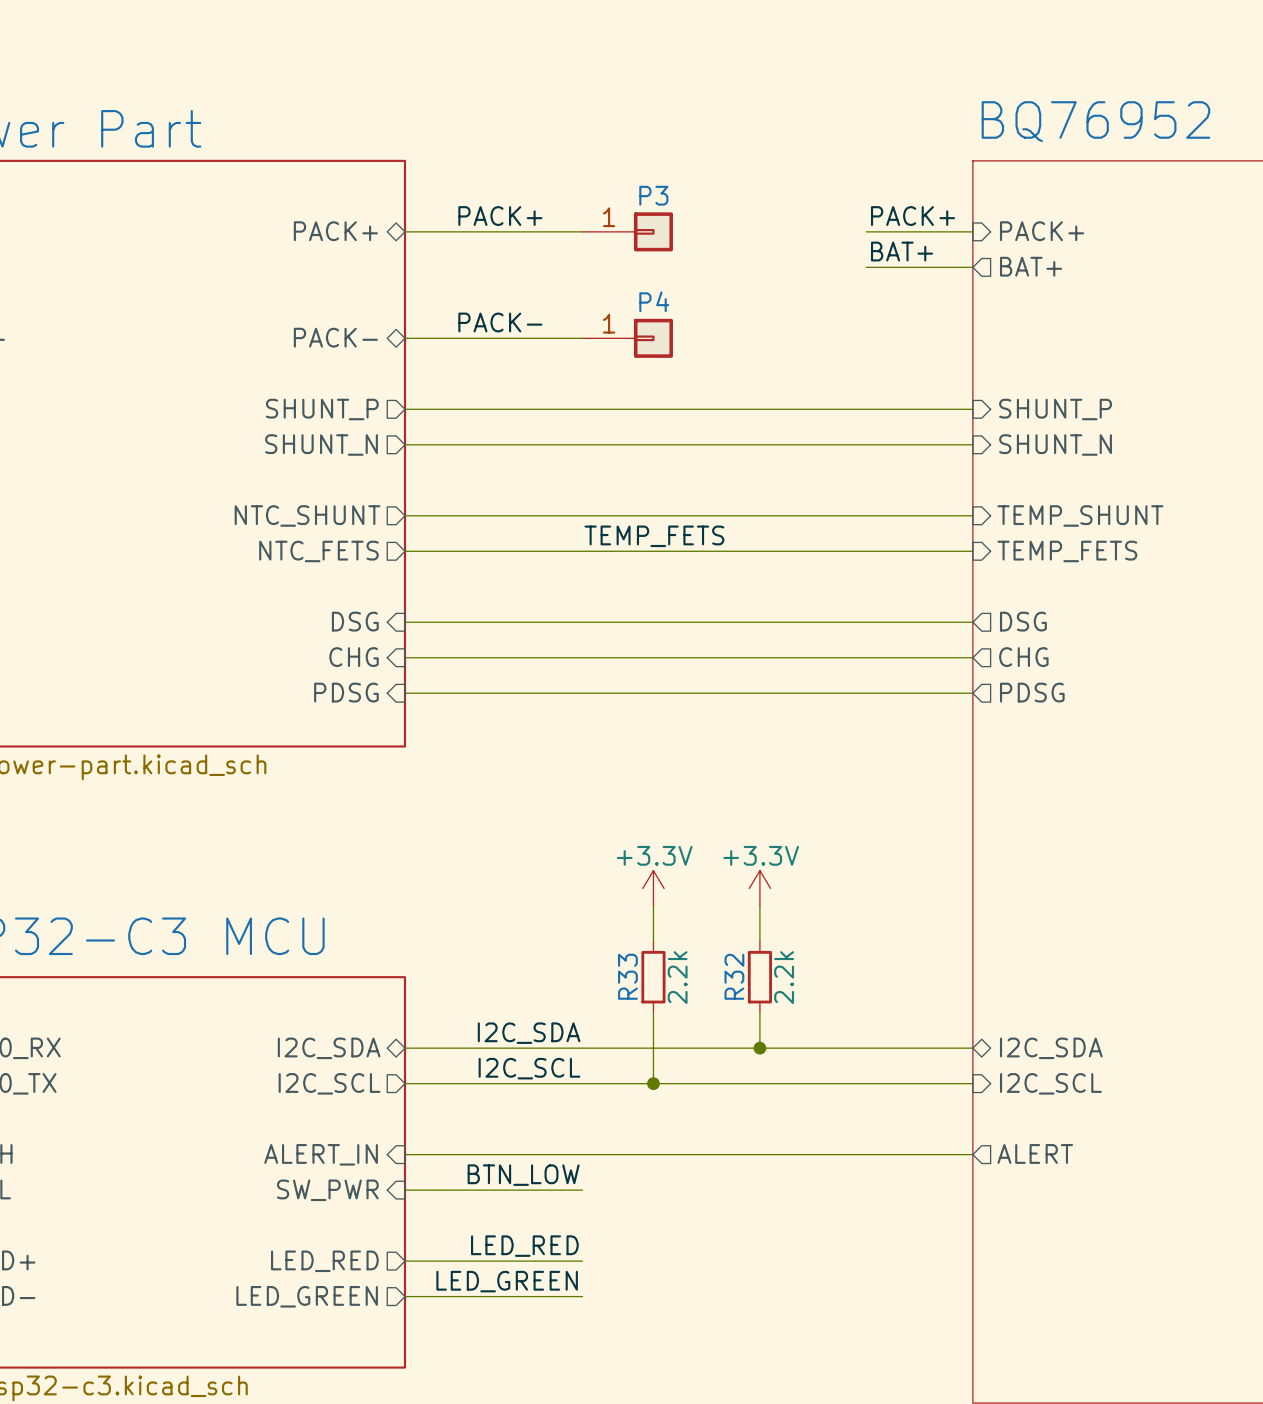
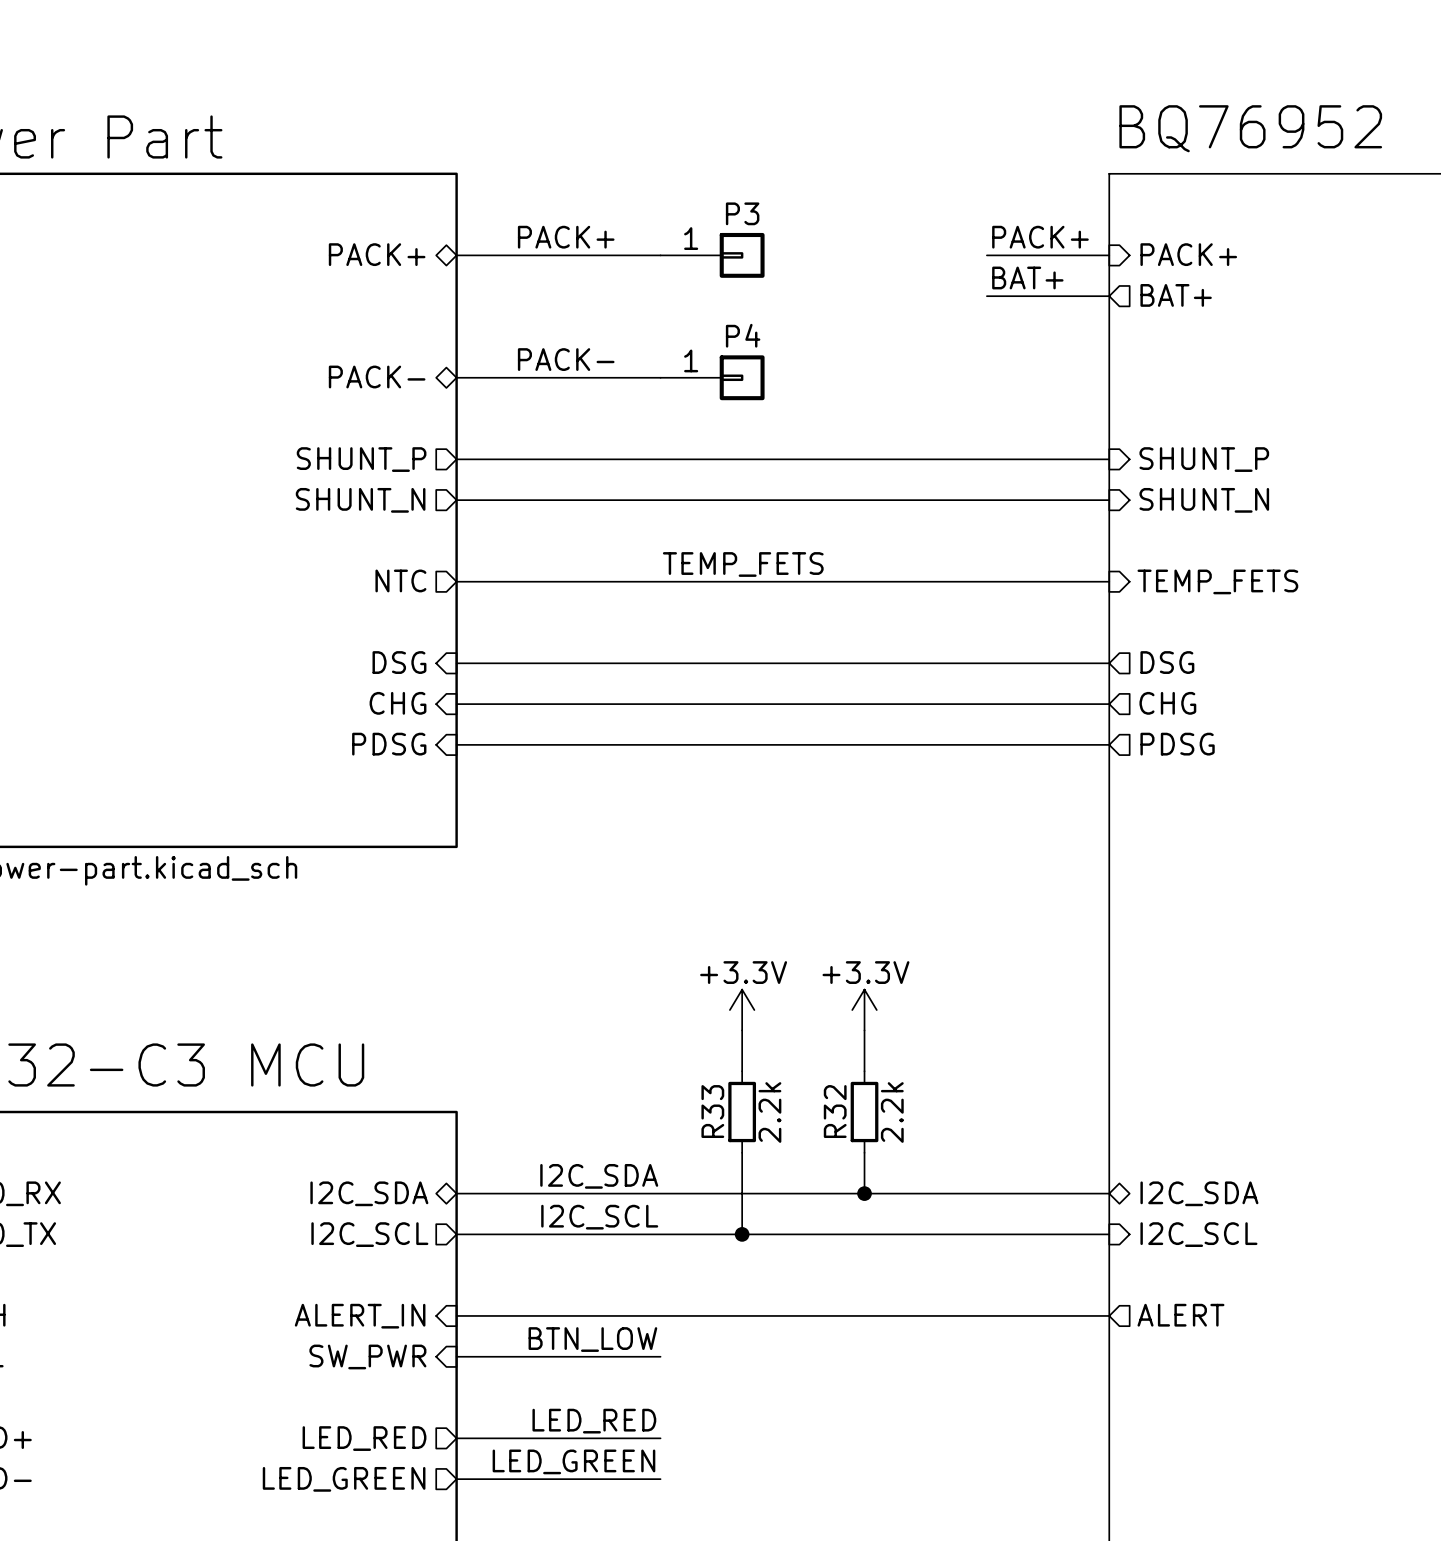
sheet pin: NTC_SHUNT (307, 515) -> NTC (400, 580)
sheet pin: TEMP_SHUNT (1080, 515) -> TEMP_FETS (1217, 581)
label position: TEMP_FETS (654, 536) -> TEMP_FETS (743, 564)
sheet pin: NTC_FETS (318, 551) -> none
wire: (405, 551) (972, 551) -> (456, 663) (1109, 663)
sheet pin: TEMP_FETS (1067, 551) -> none
sheet pin: none -> DSG (399, 662)
sheet pin: none -> DSG (1167, 662)
sheet pin: DSG (355, 621) -> CHG (398, 703)
sheet pin: DSG (1023, 621) -> CHG (1167, 703)
sheet pin: CHG (354, 657) -> PDSG (389, 744)
sheet pin: CHG (1023, 657) -> PDSG (1177, 744)
sheet pin: PDSG (346, 692) -> none
sheet pin: PDSG (1032, 692) -> none
wire: (405, 693) (972, 693) -> none

